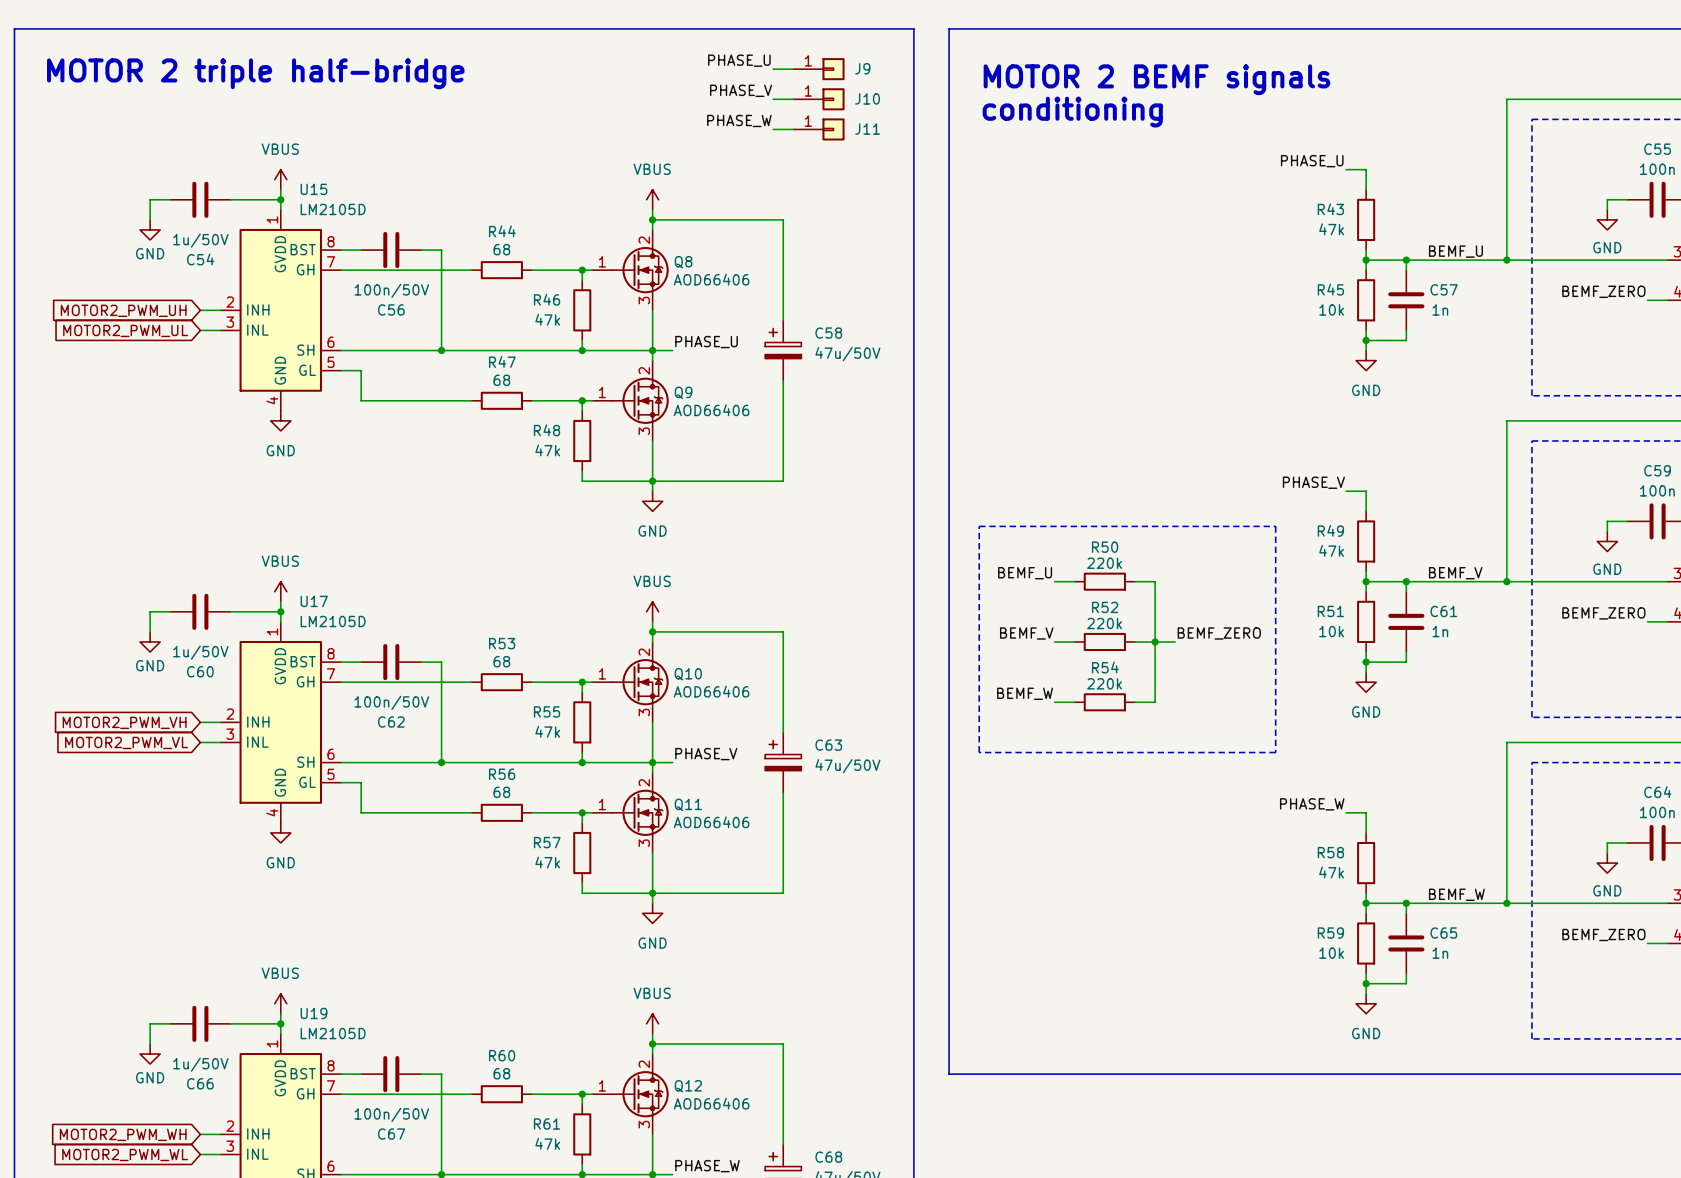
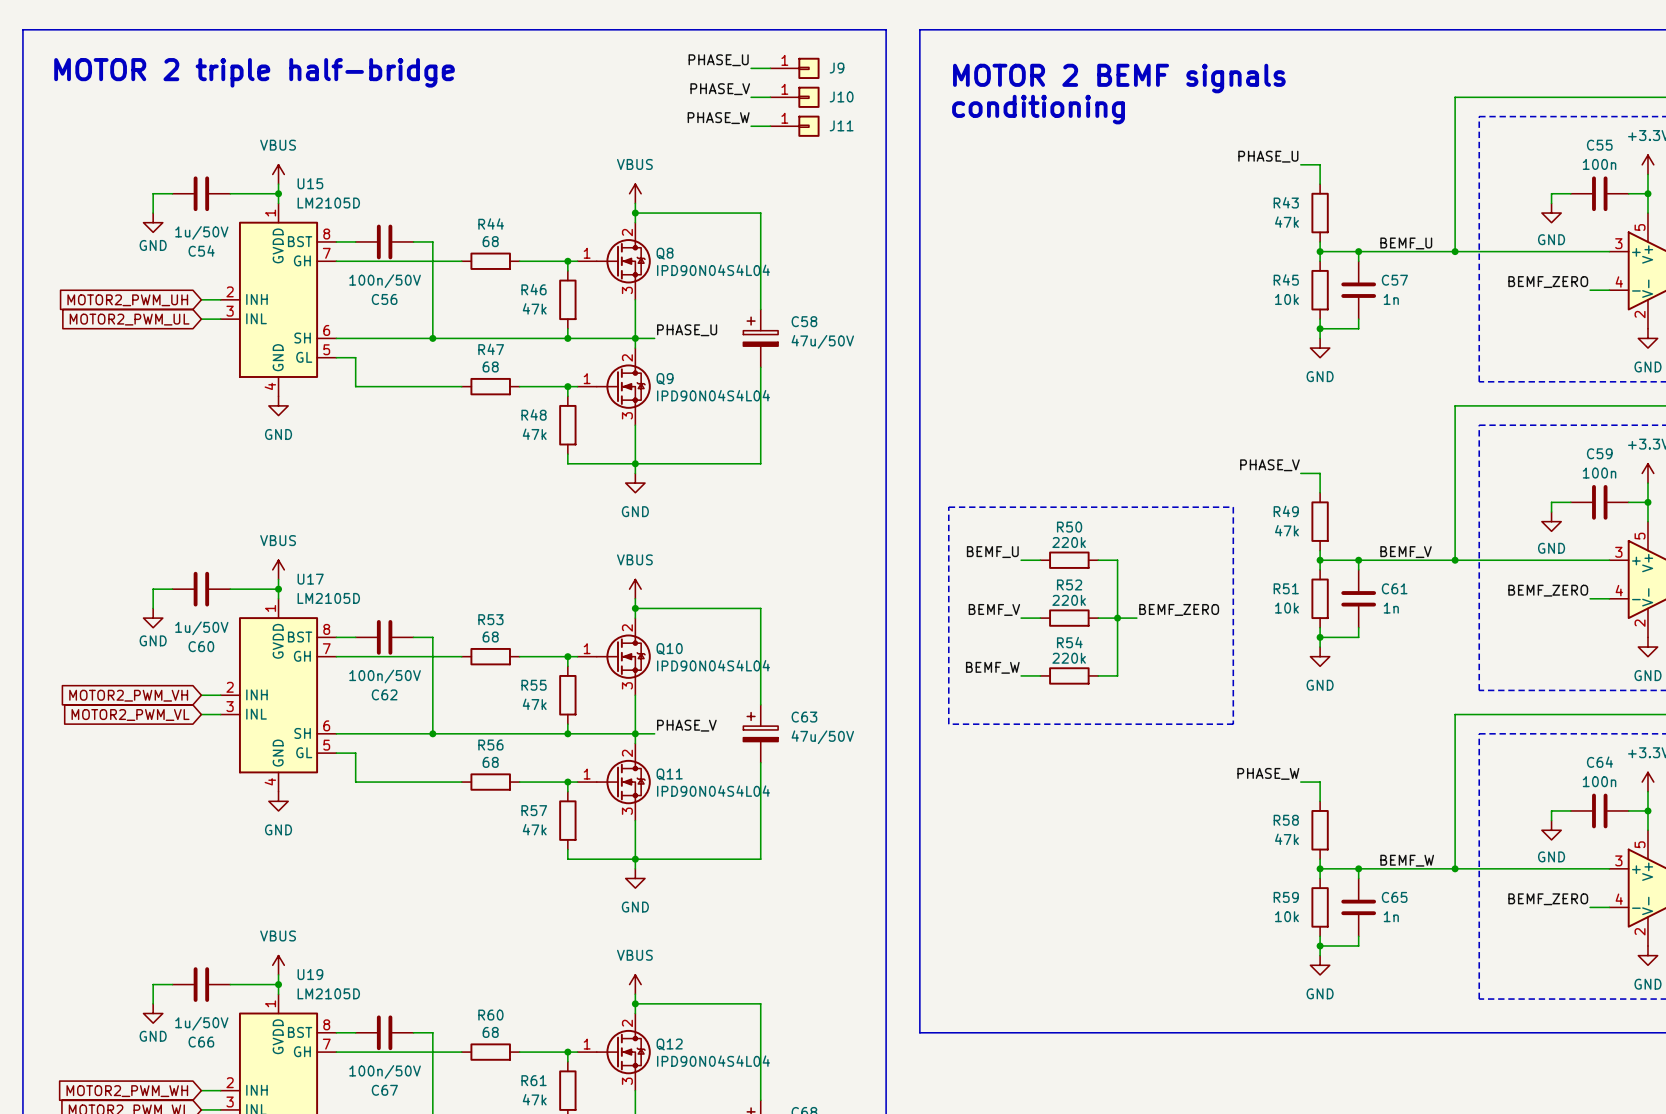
Q8 value: AOD66406 (711, 279) -> IPD90N04S4L04 (713, 270)
Q9 value: AOD66406 (711, 410) -> IPD90N04S4L04 (713, 395)
Q10 value: AOD66406 (711, 691) -> IPD90N04S4L04 (713, 665)
Q11 value: AOD66406 (711, 822) -> IPD90N04S4L04 (713, 791)
Q12 value: AOD66406 (711, 1103) -> IPD90N04S4L04 (713, 1061)

